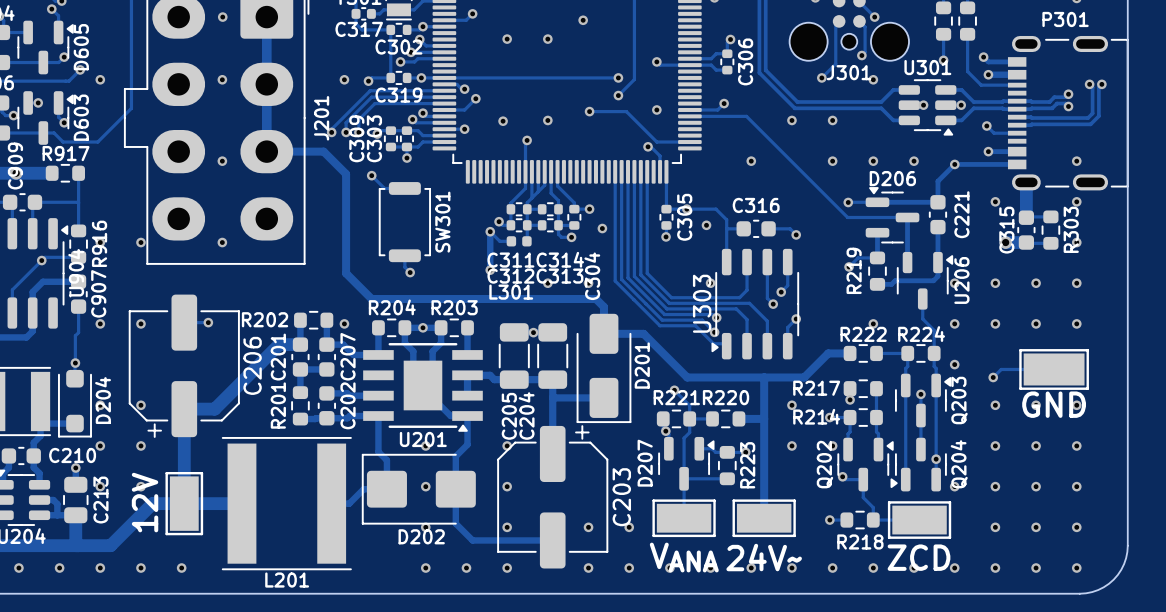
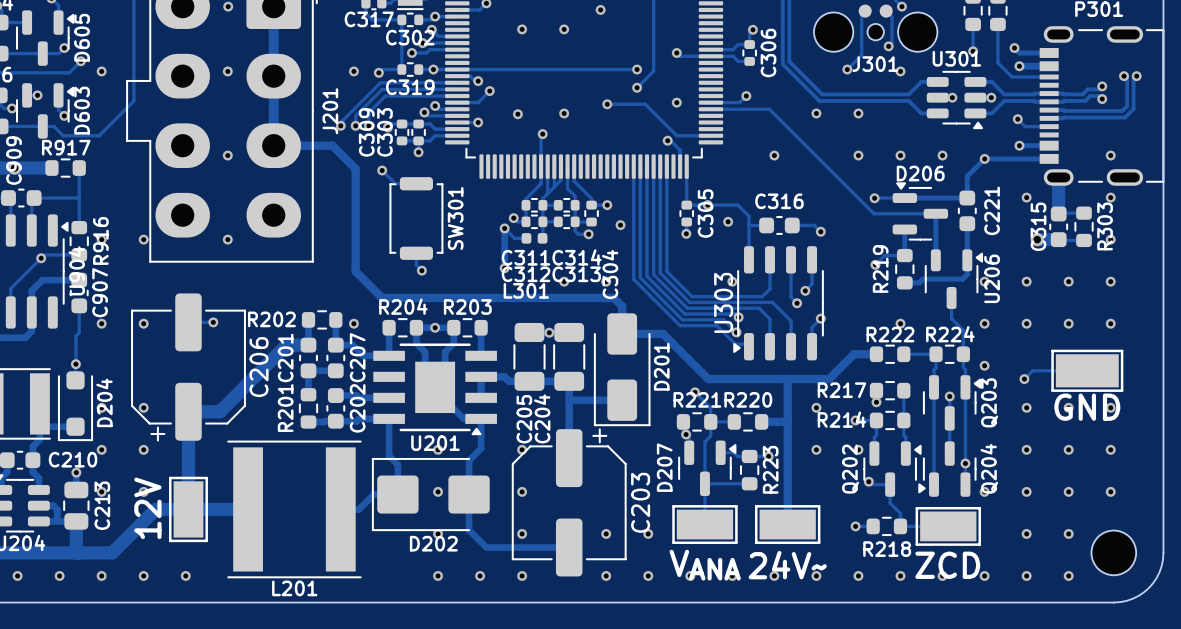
via: (1076, 527) -> none
part: none -> (1113, 552)
via: (1076, 568) -> none

